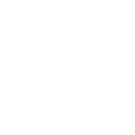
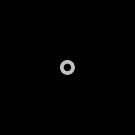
via: none -> (67, 67)

